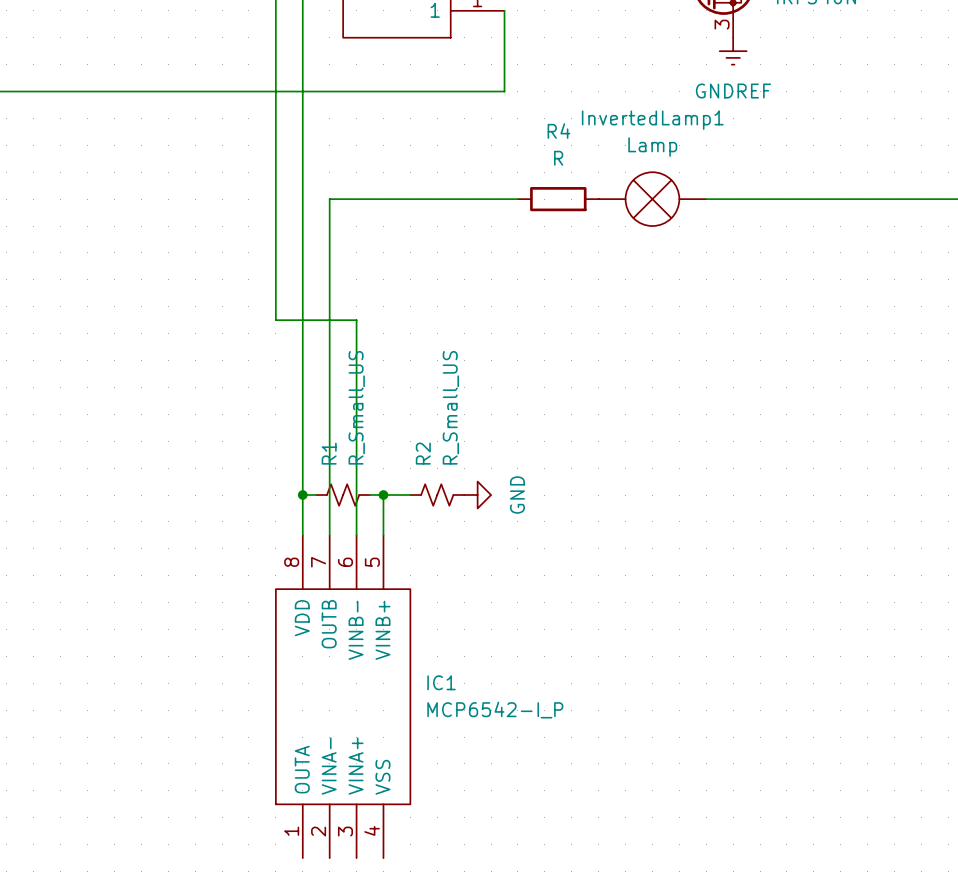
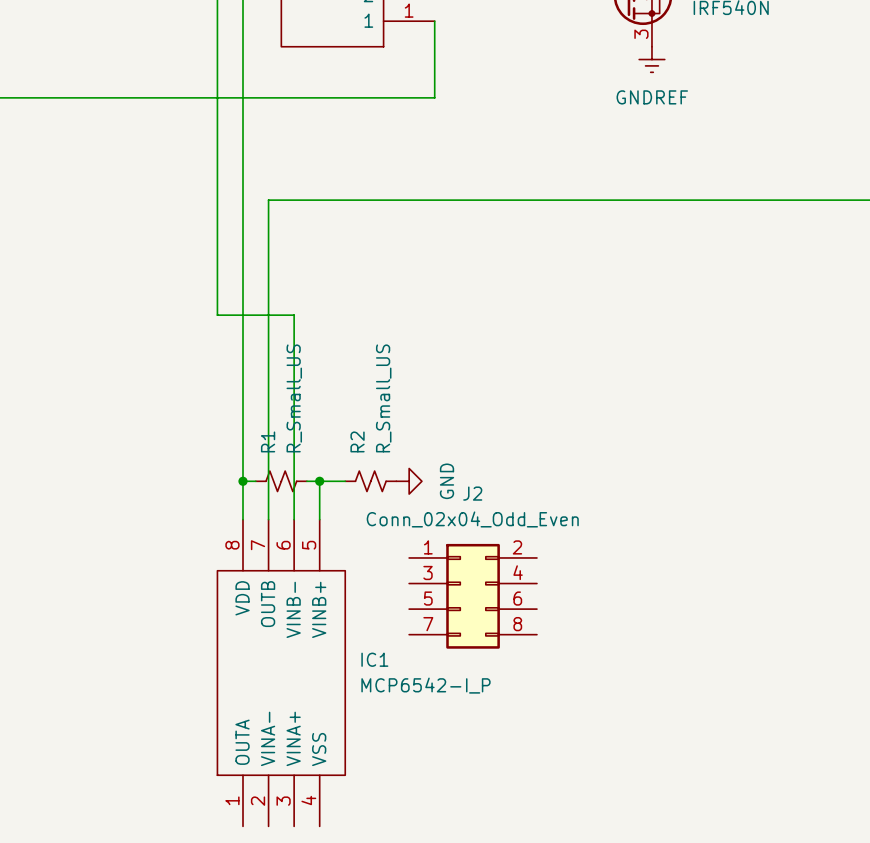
wire: none -> (447, 200) (626, 200)
R4: R (558, 199) -> none
InvertedLamp1: Lamp (652, 199) -> none
J2: none -> Conn_02x04_Odd_Even (473, 596)

